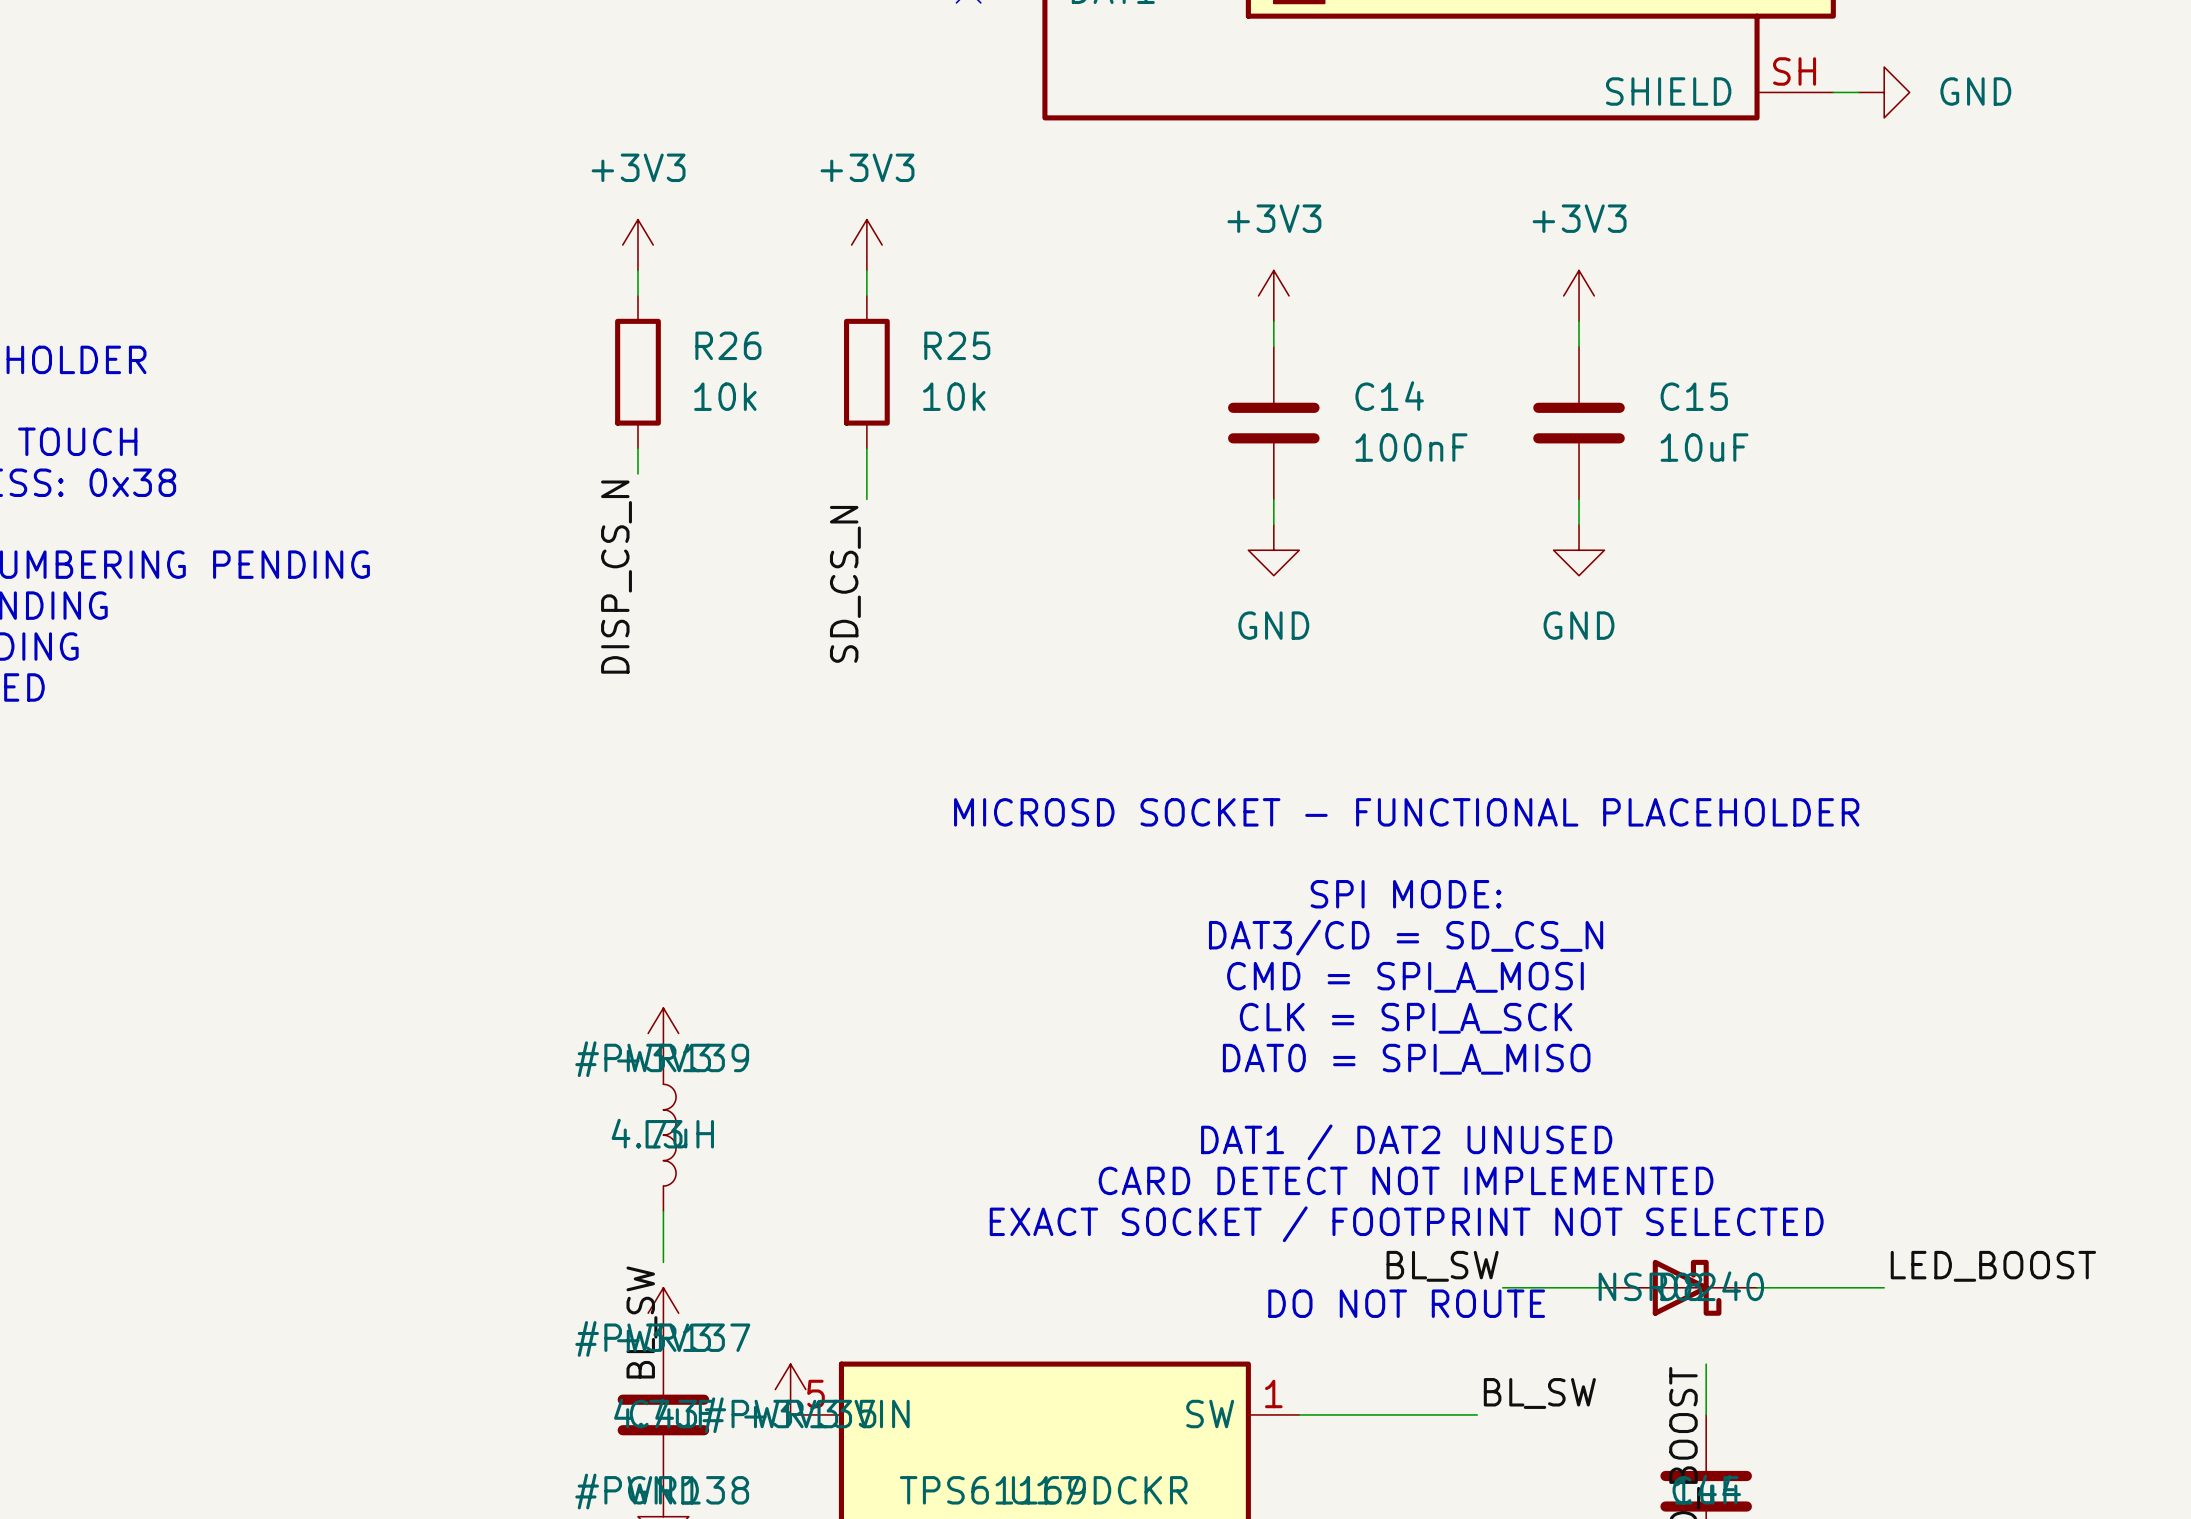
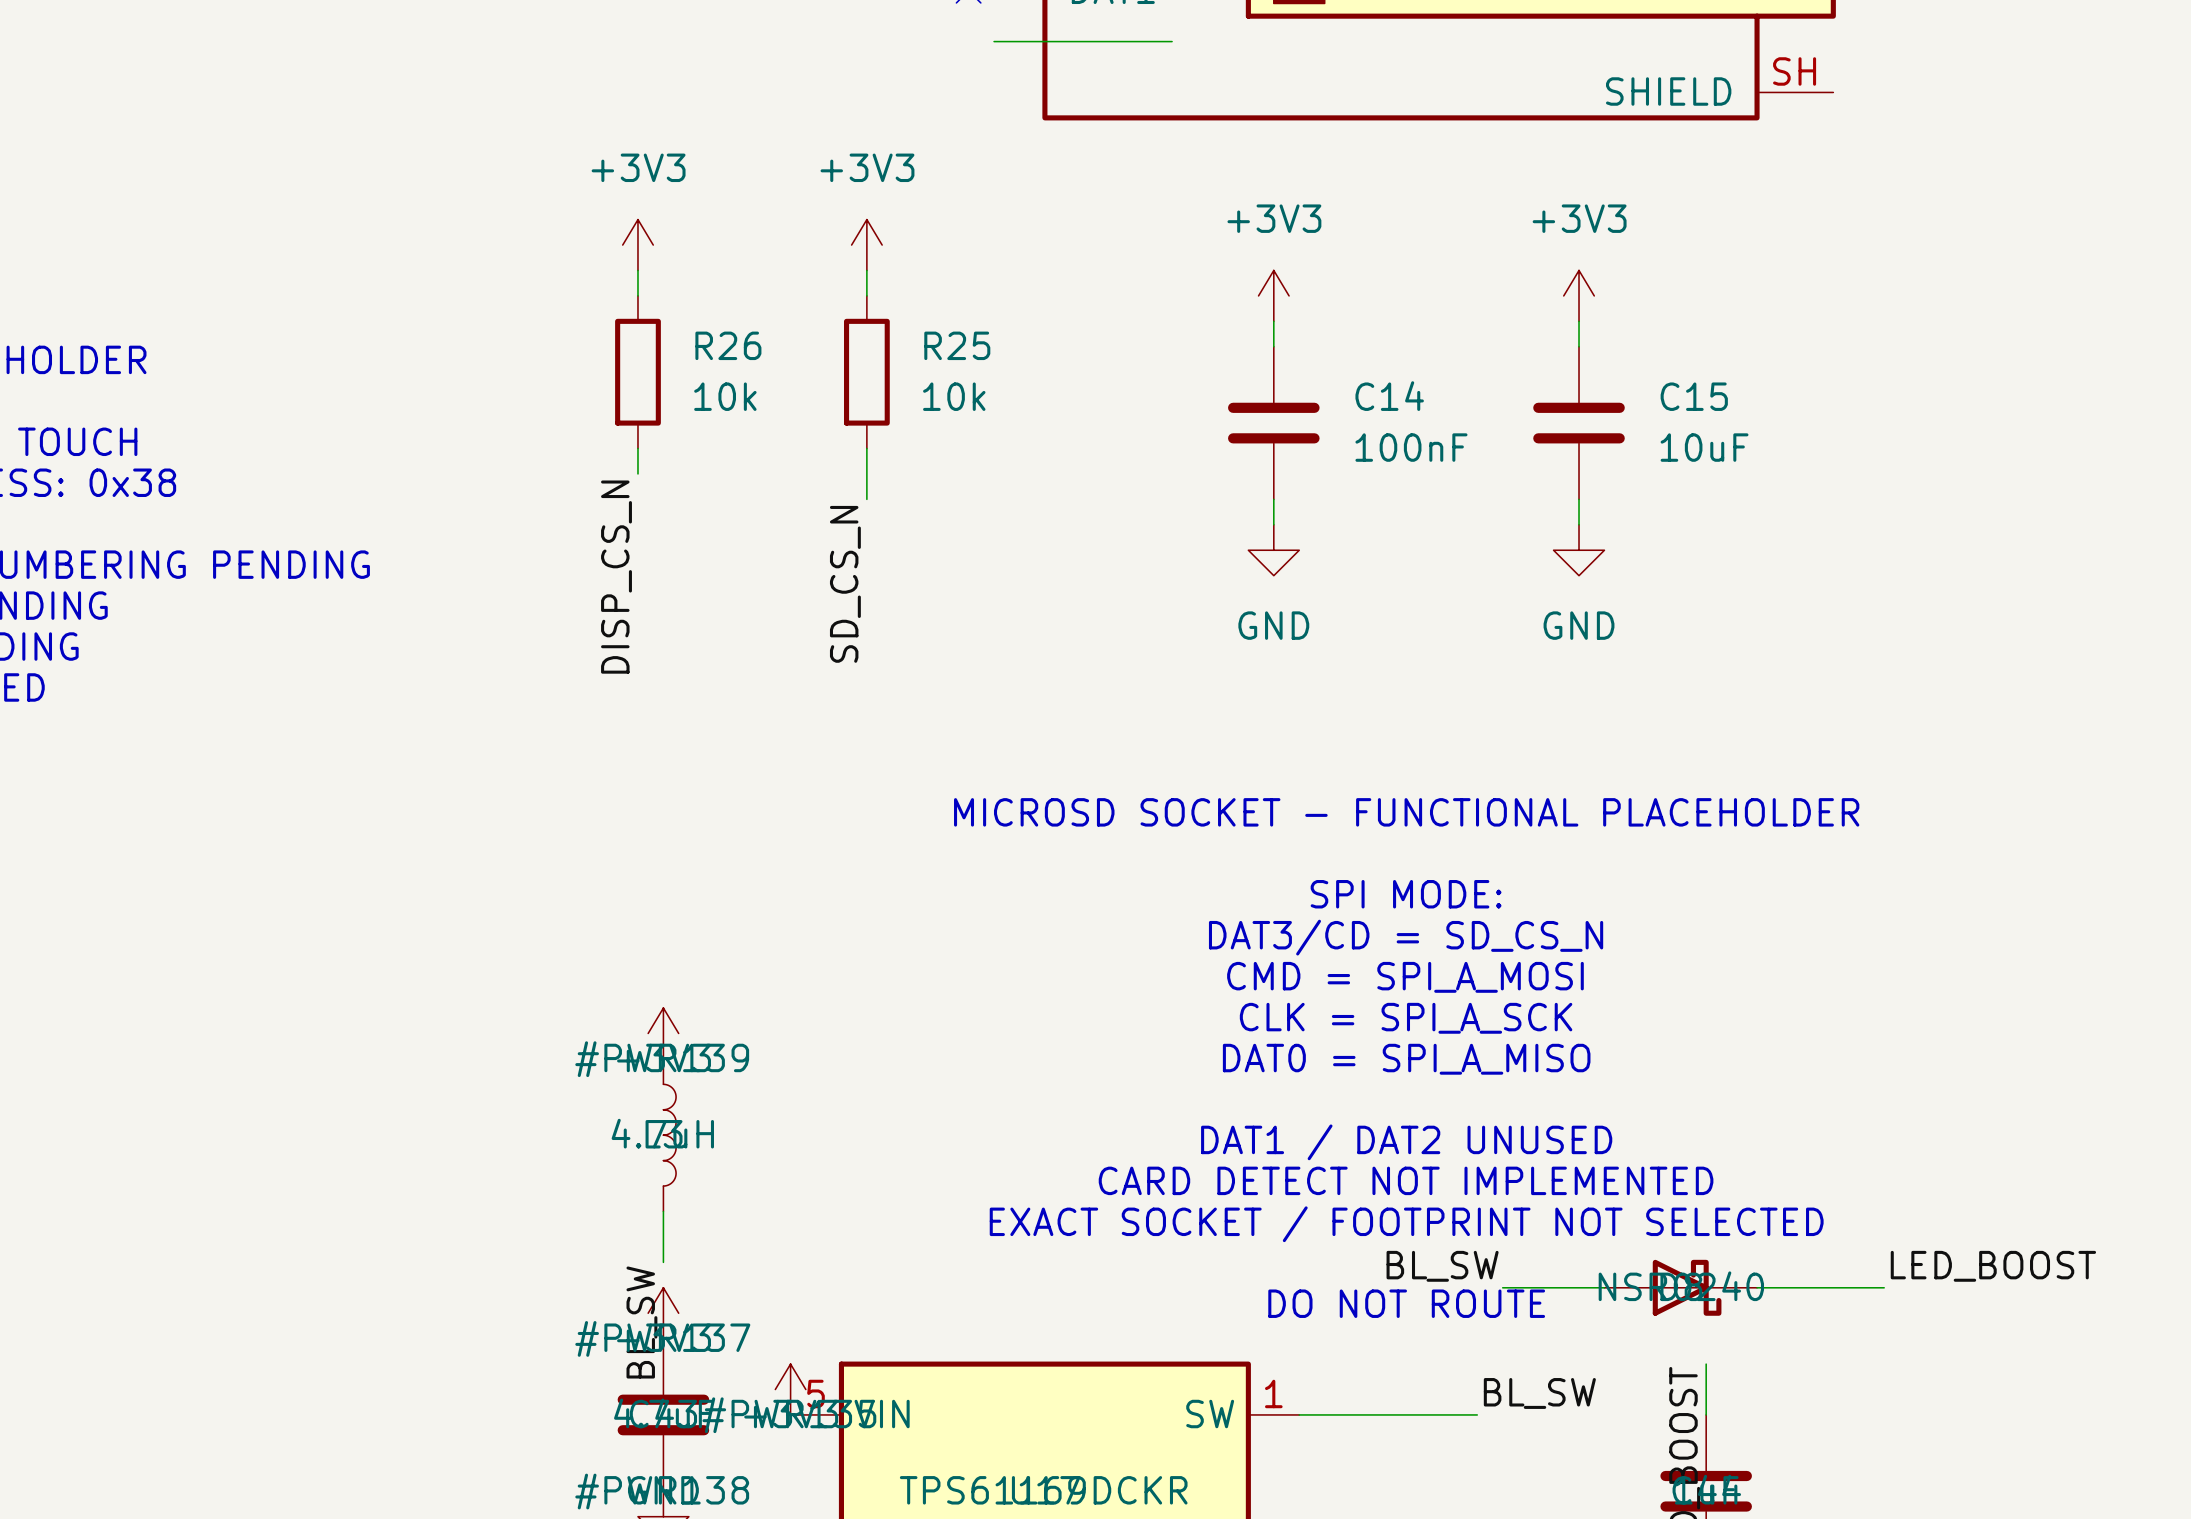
wire: none -> (994, 41) (1172, 41)
wire: (1833, 92) (1858, 92) -> none
power symbol: GND (1884, 92) -> none

